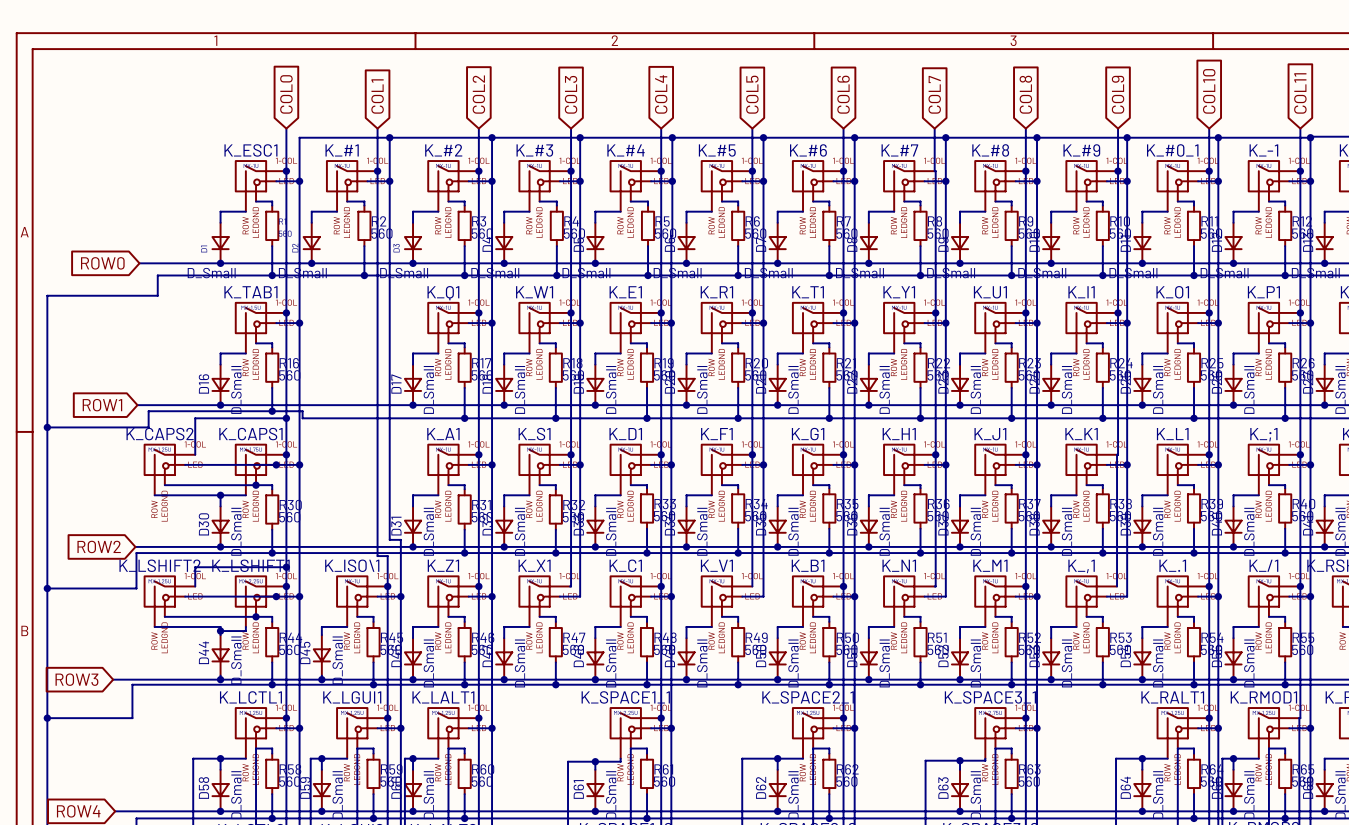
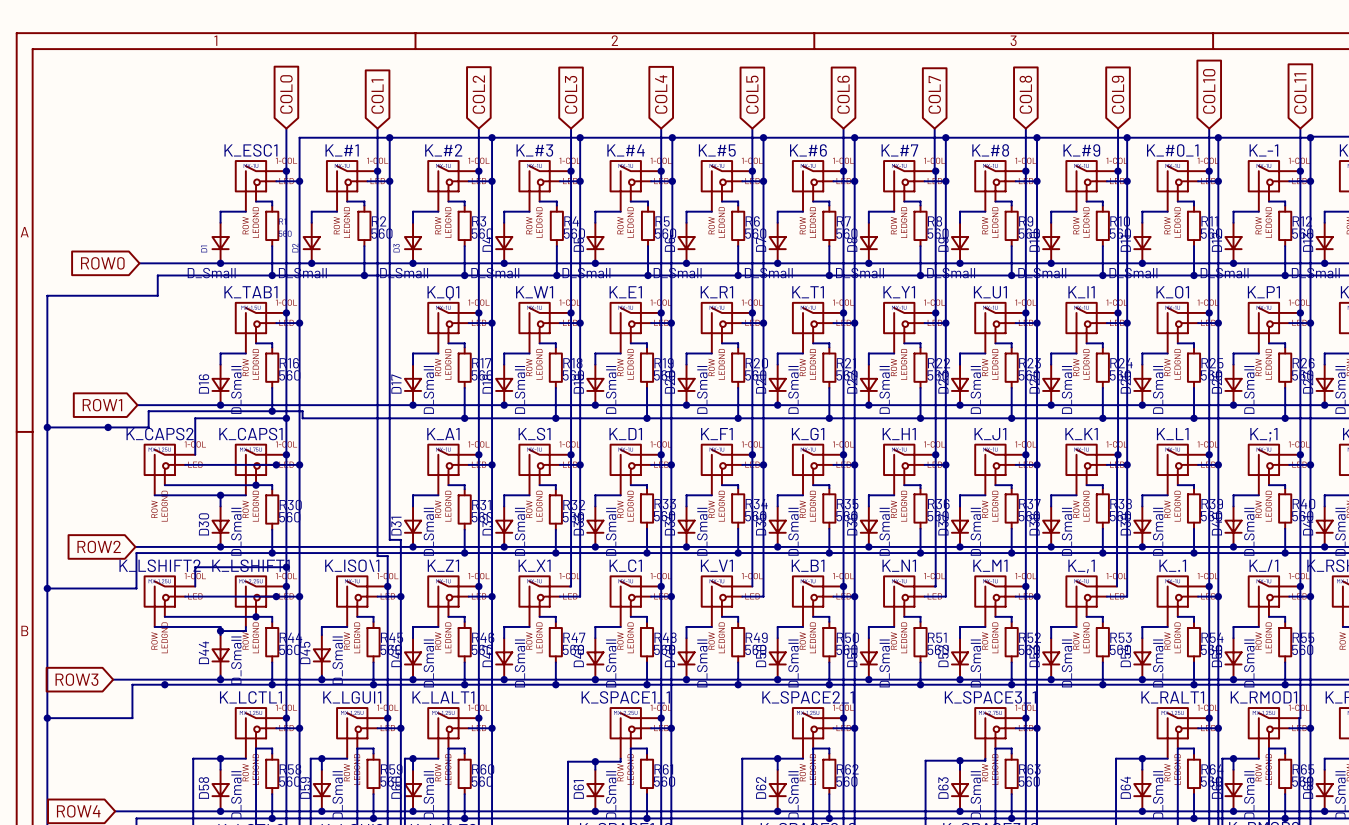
junction: none -> (935, 171)
junction: none -> (108, 427)
junction: none -> (1118, 454)
junction: none -> (164, 684)

